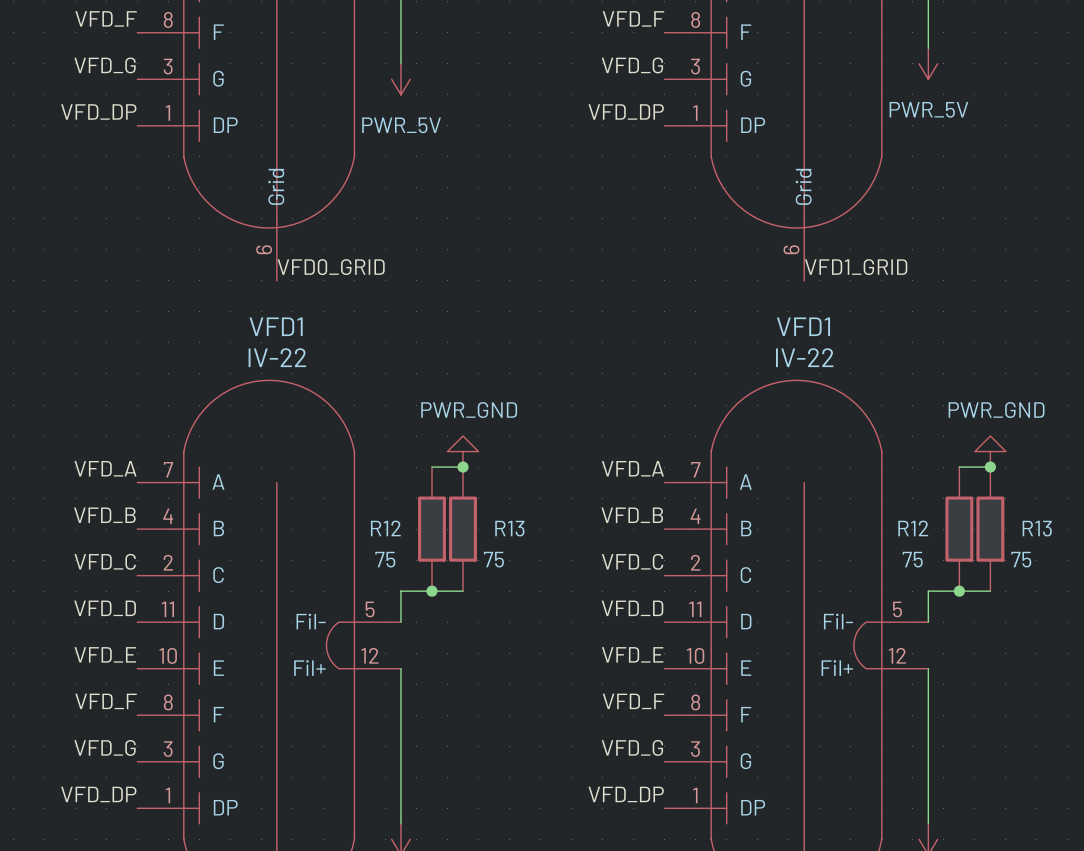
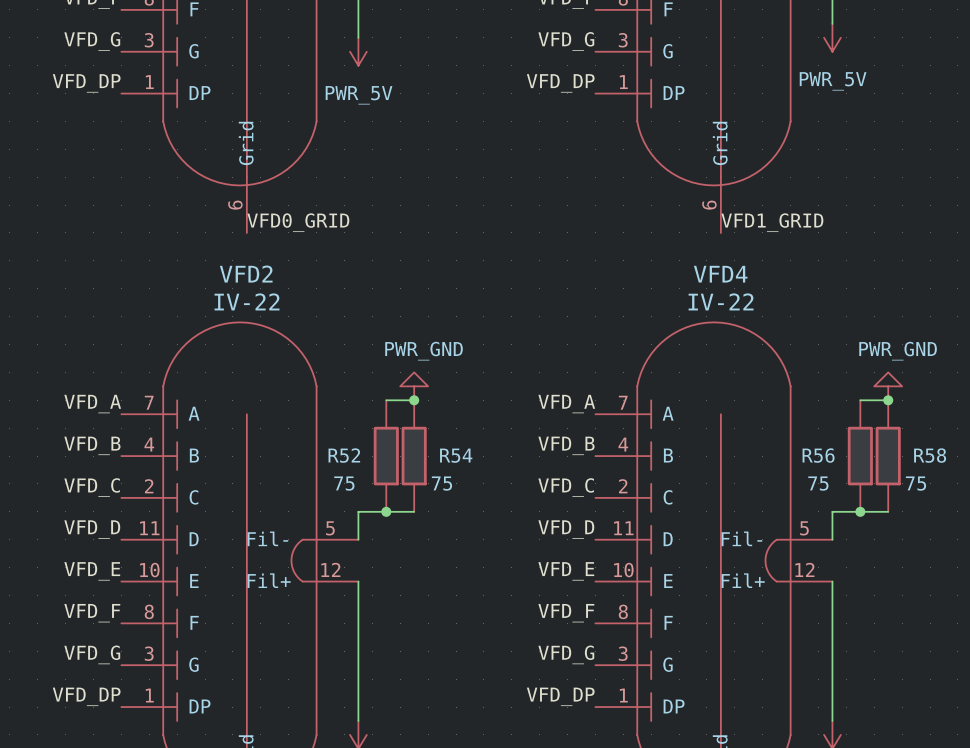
VFD1 name: VFD1 (276, 326) -> VFD2 (246, 274)
VFD1 name: VFD1 (803, 326) -> VFD4 (720, 274)
R12 name: R12 (385, 528) -> R52 (344, 455)
R13 name: R13 (509, 528) -> R54 (456, 455)
R12 name: R12 (913, 528) -> R56 (818, 455)
R13 name: R13 (1037, 528) -> R58 (930, 455)

